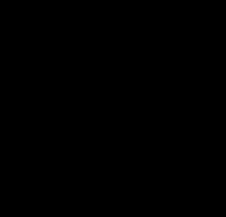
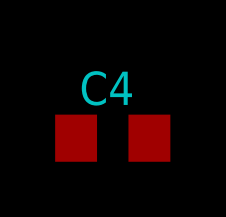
C4: none -> (112, 138)

